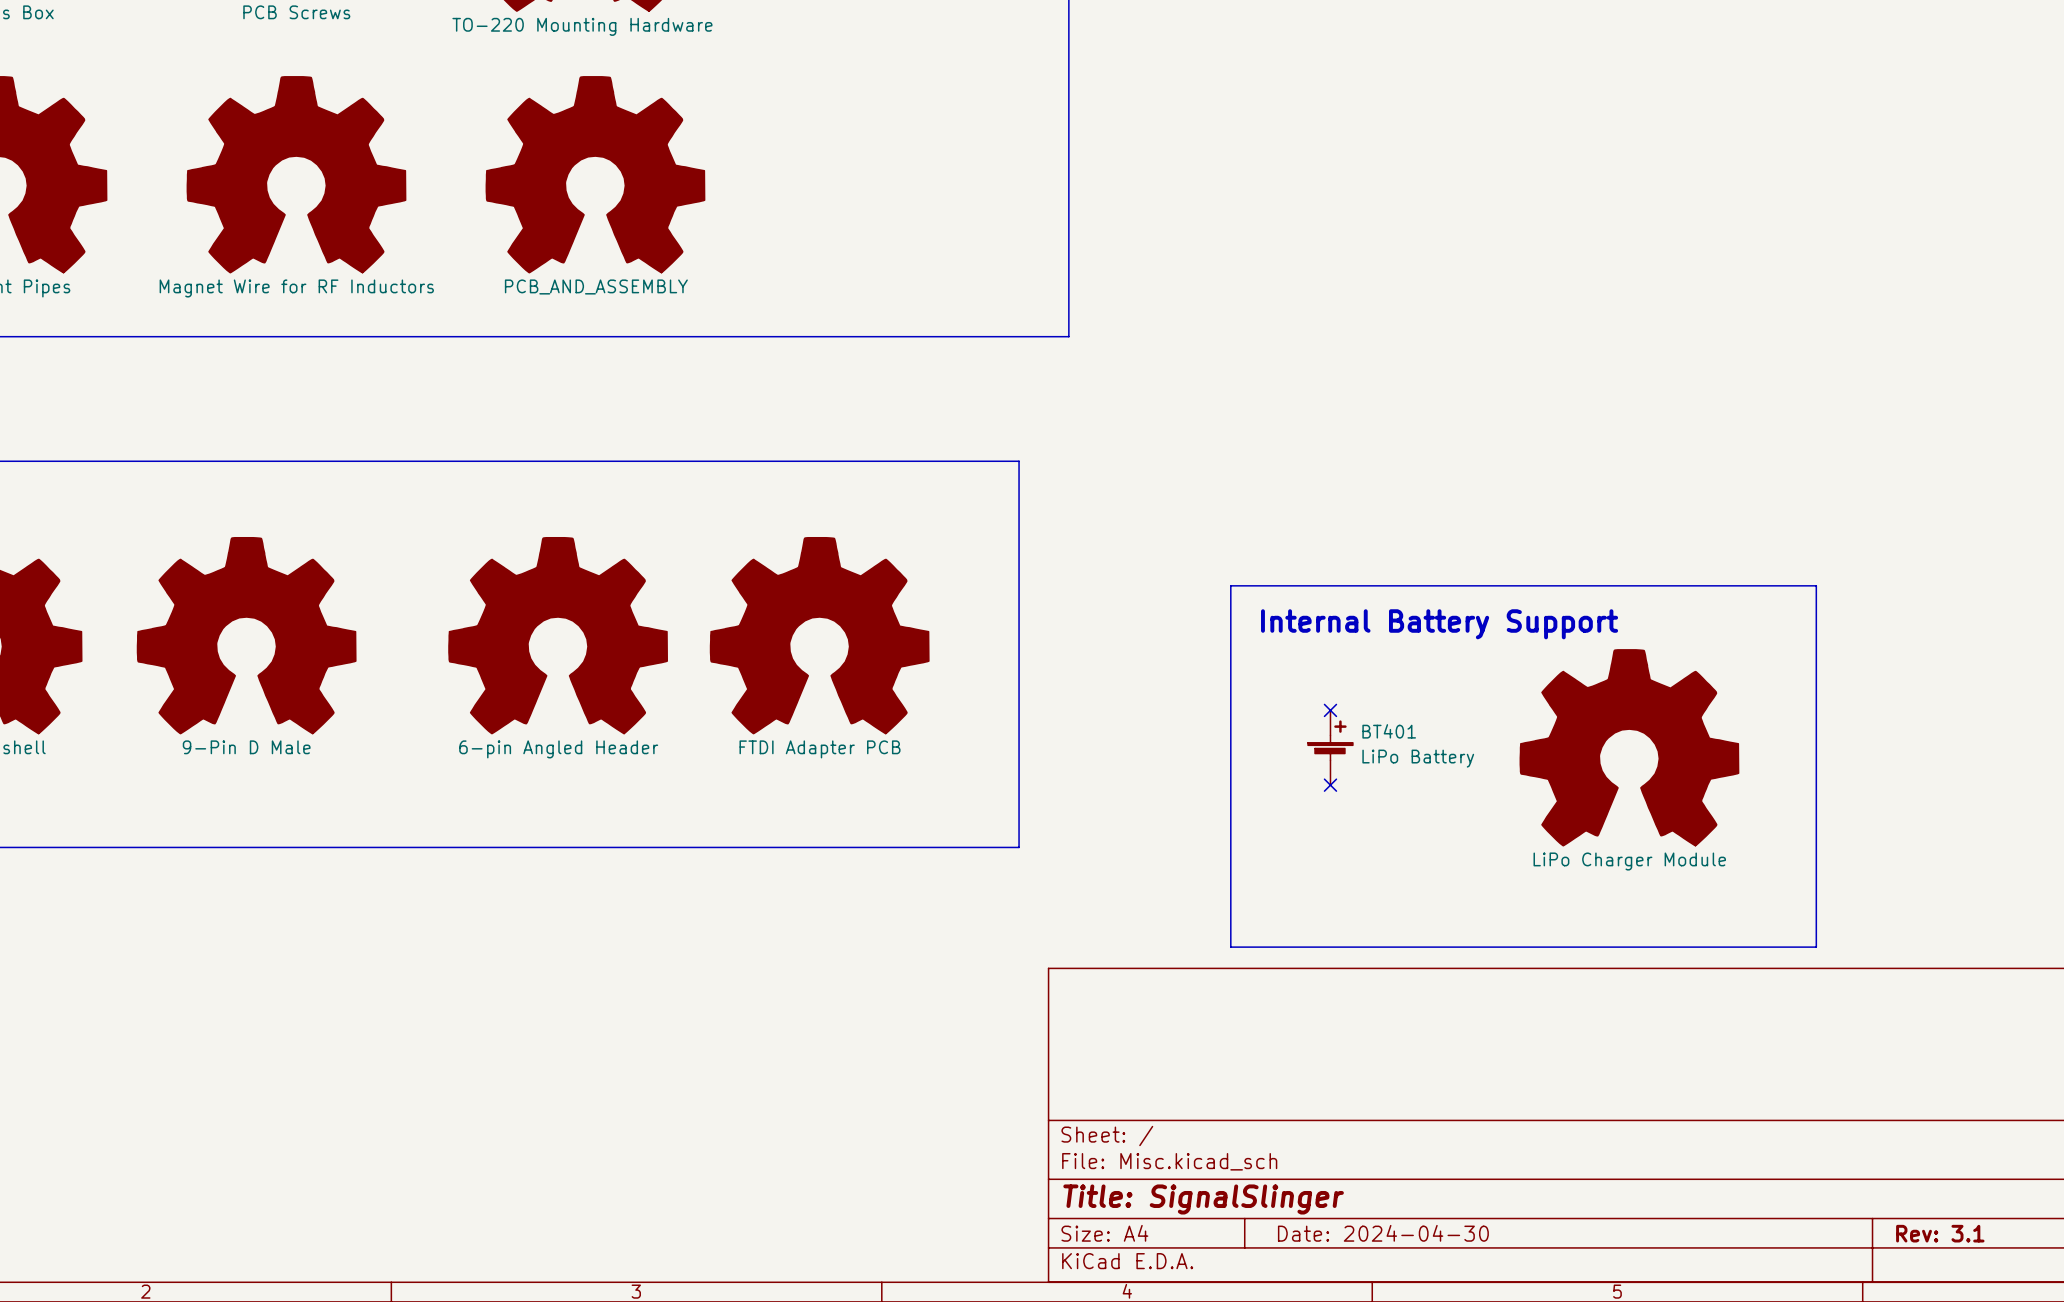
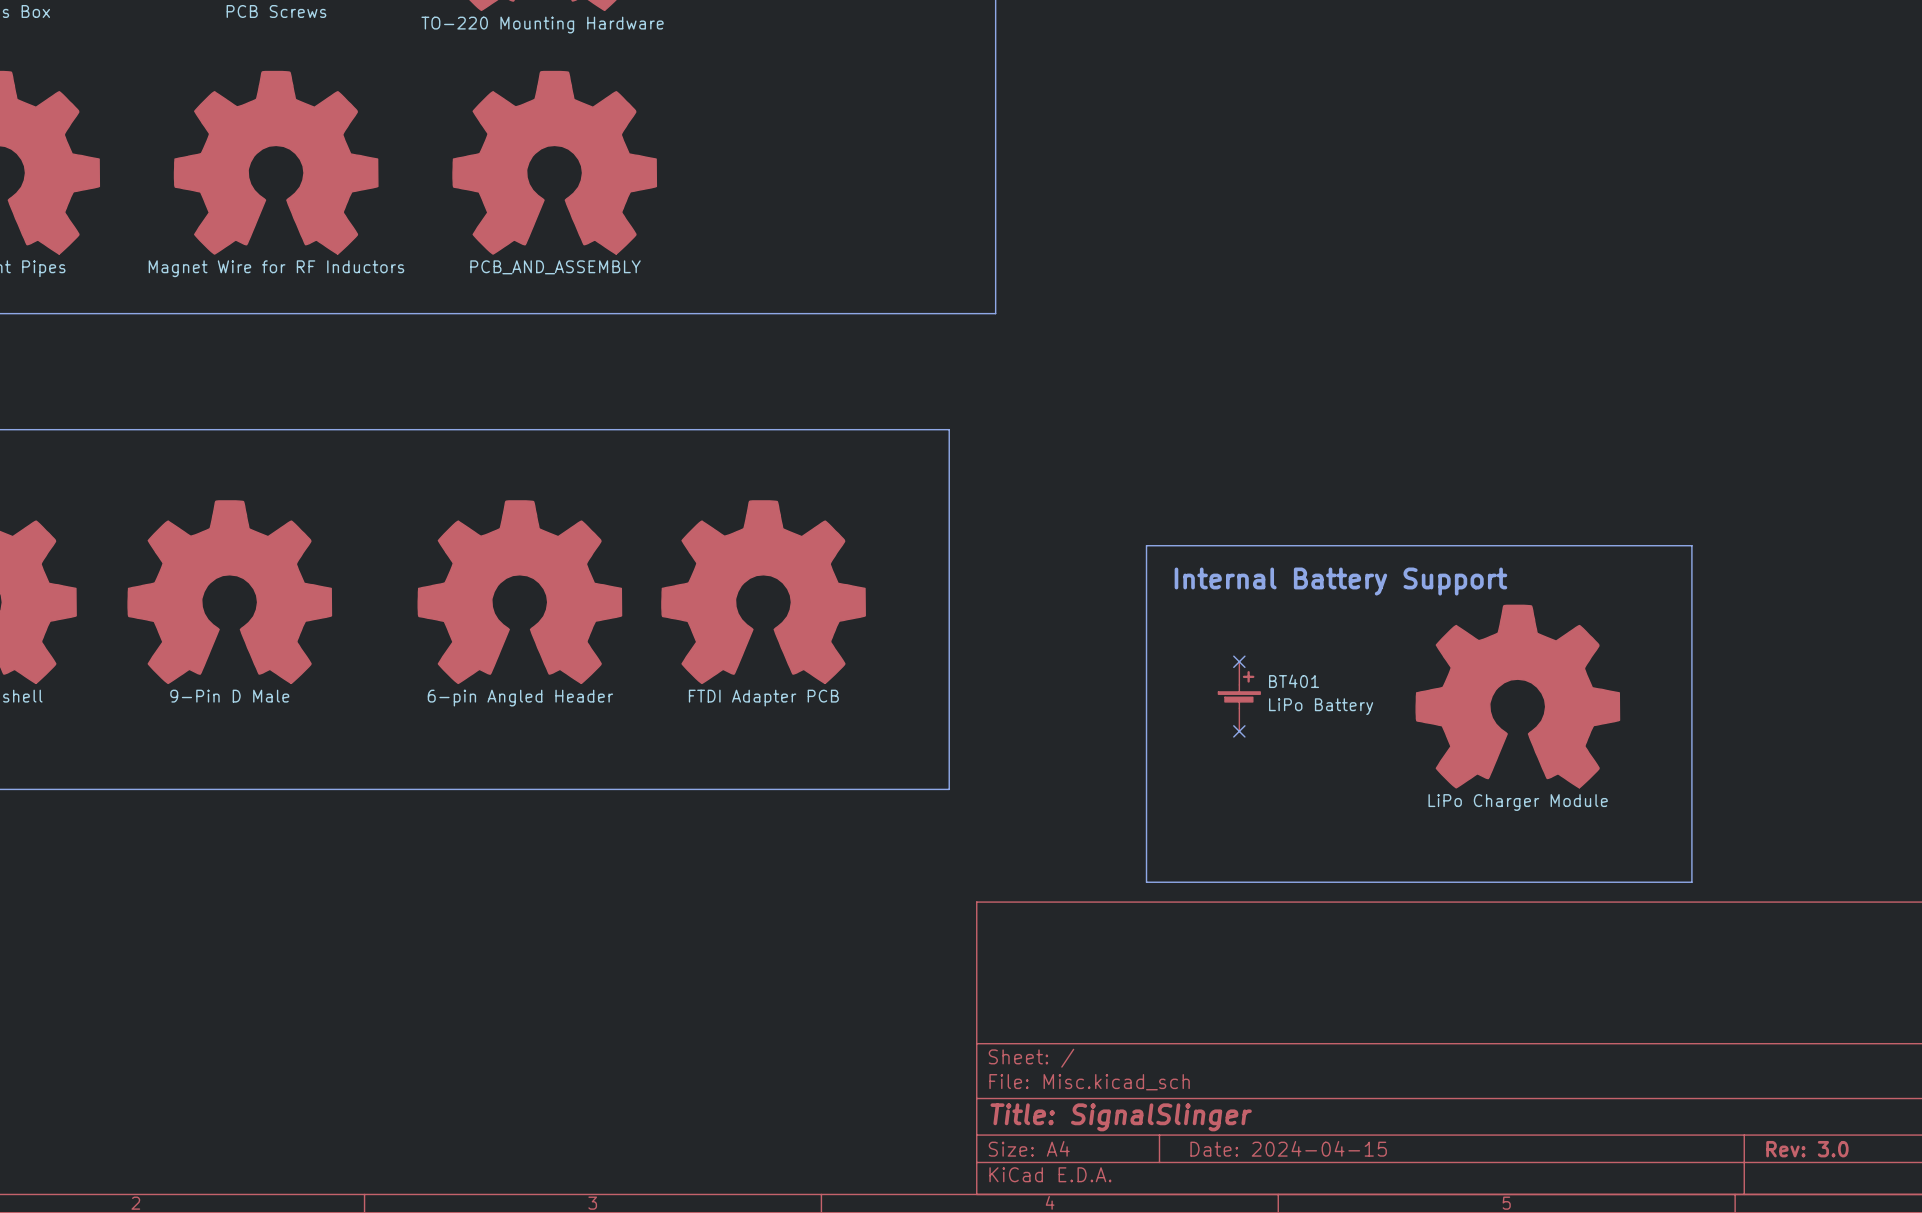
title block: Date: 2024-04-30 (1383, 1233) -> Date: 2024-04-15 (1288, 1148)
title block: Rev: 3.1 (1940, 1233) -> Rev: 3.0 (1807, 1149)

